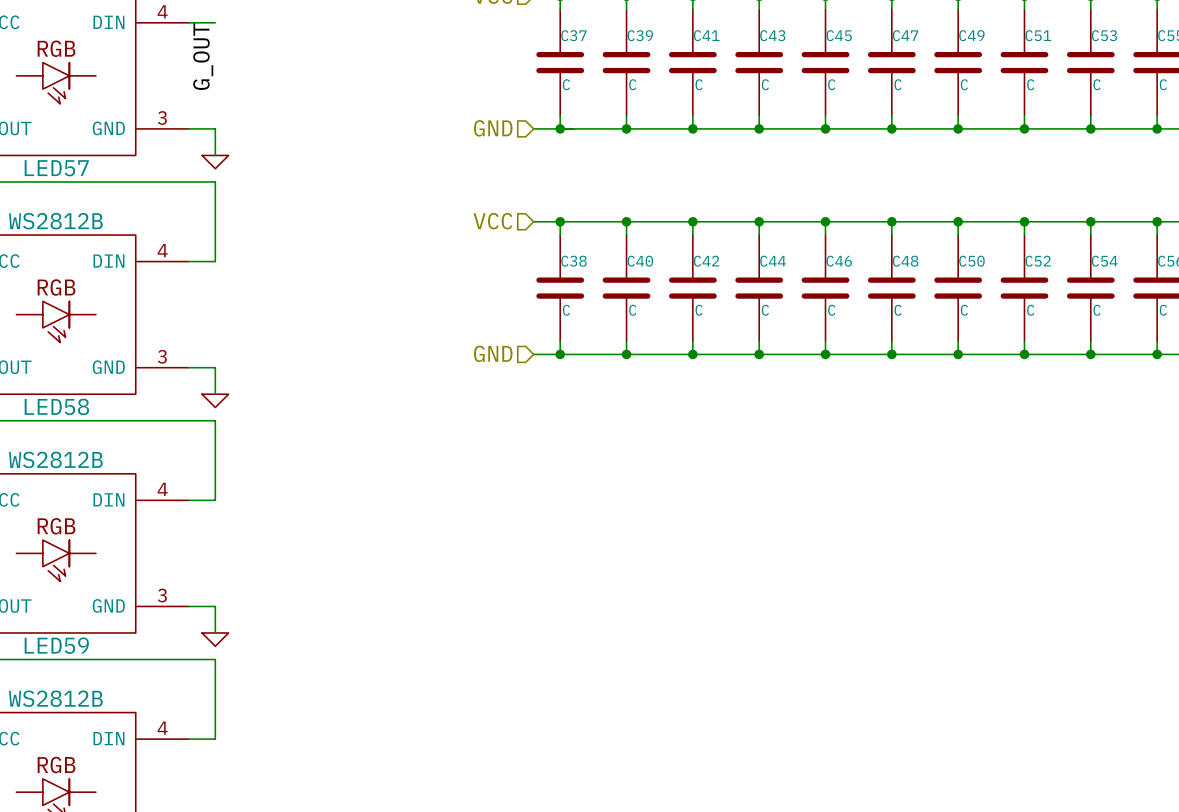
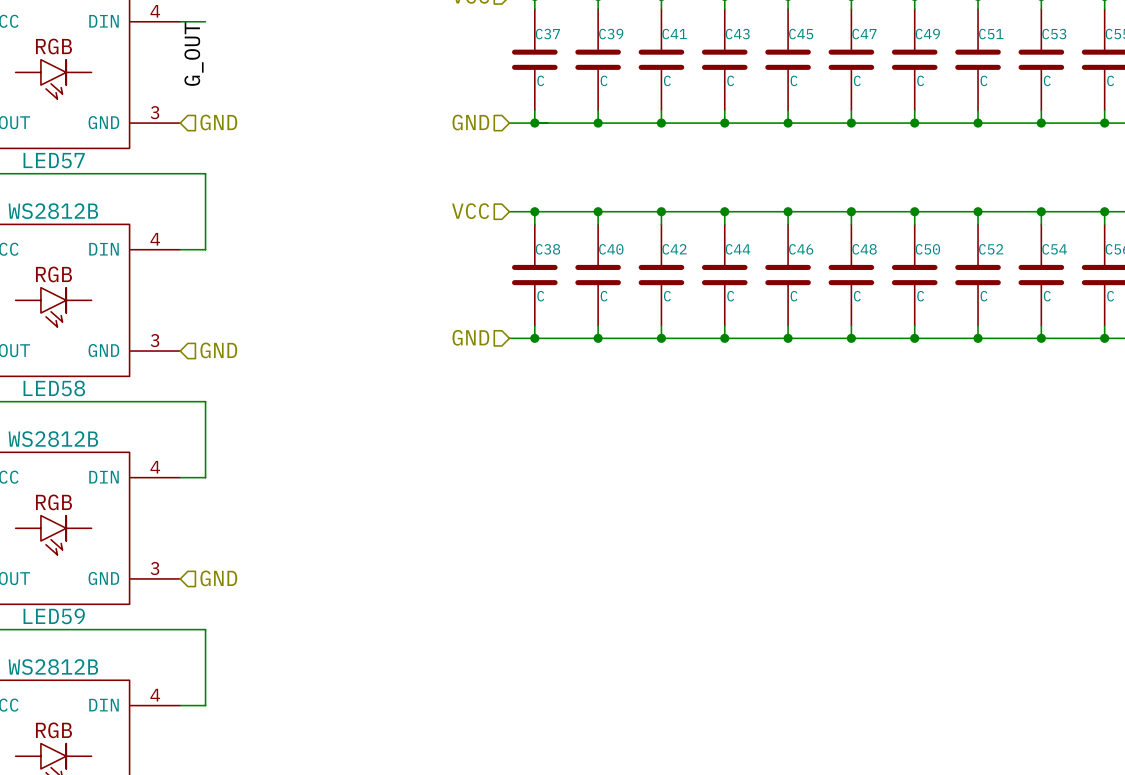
wire: (188, 128) (215, 128) (215, 155) -> none
hierarchical label: none -> GND (218, 122)
power symbol: (215, 162) -> none
wire: (188, 367) (215, 367) (215, 394) -> none
hierarchical label: none -> GND (218, 350)
power symbol: (215, 400) -> none
hierarchical label: none -> GND (218, 578)
wire: (188, 606) (215, 606) (215, 632) -> none
power symbol: (215, 639) -> none

